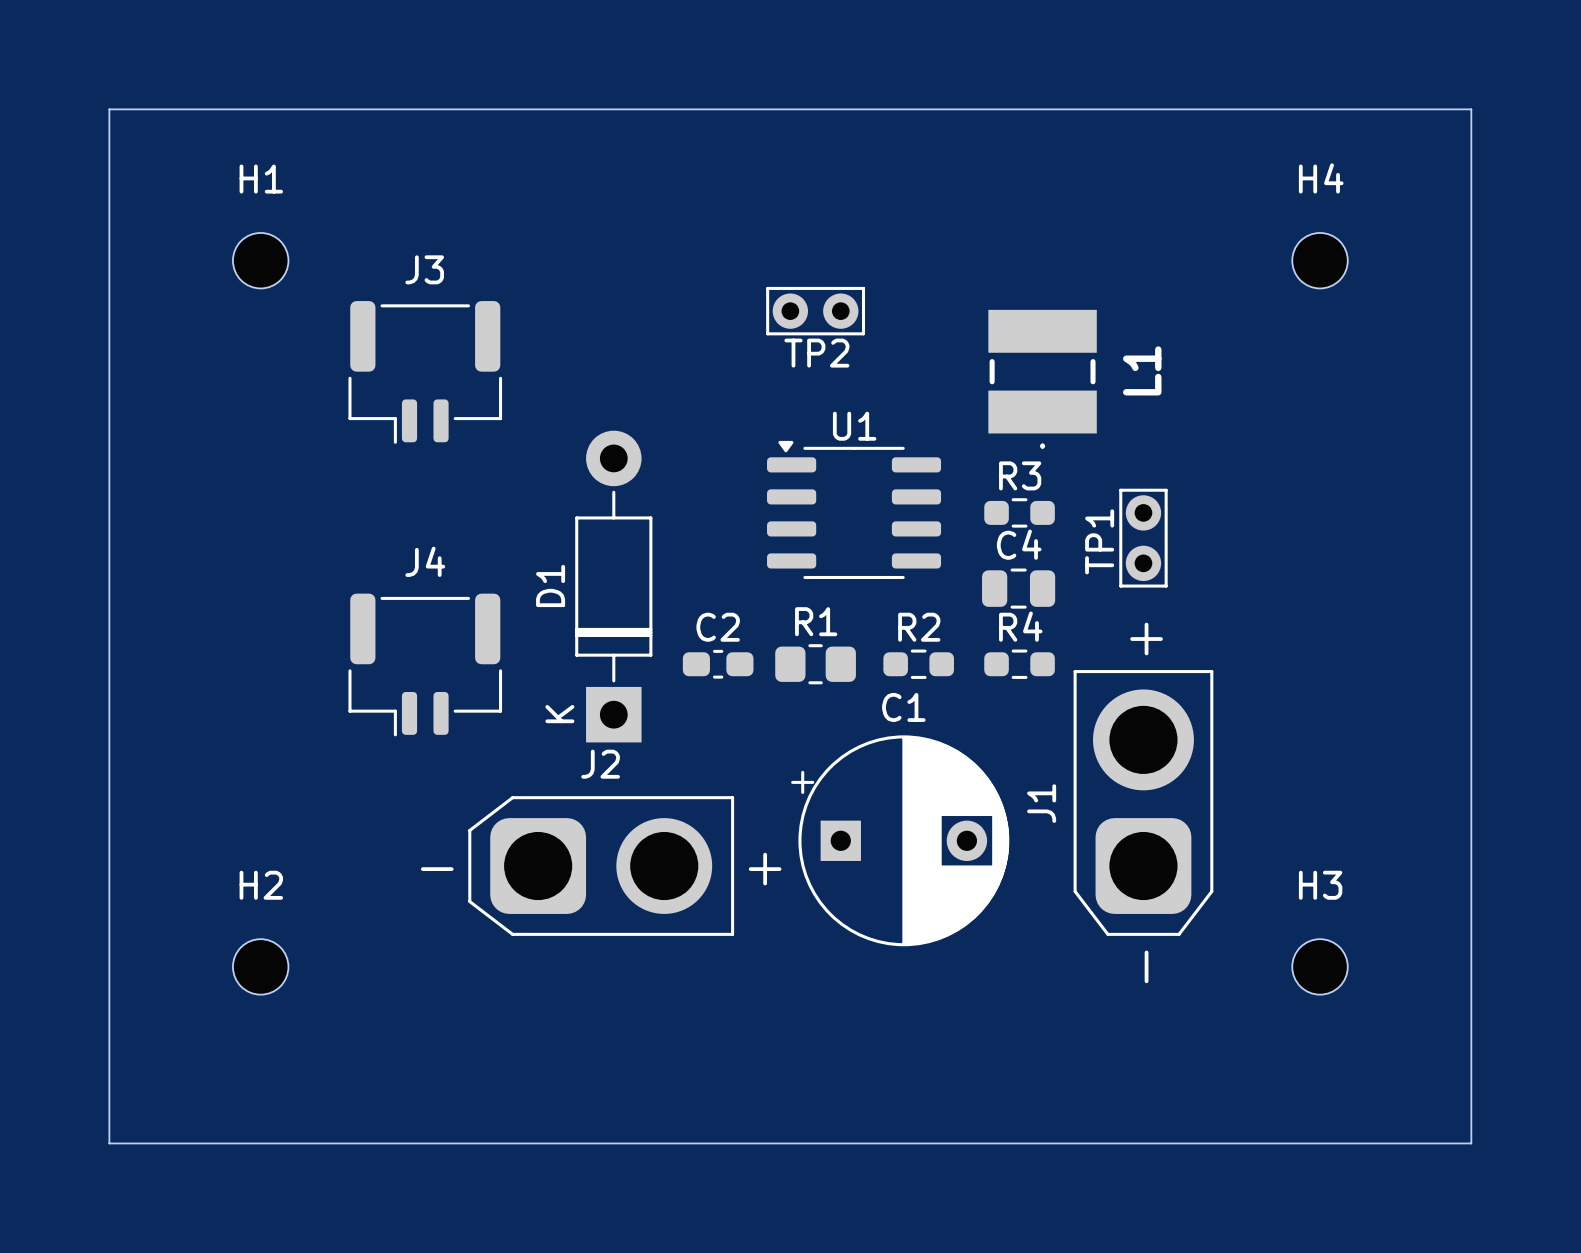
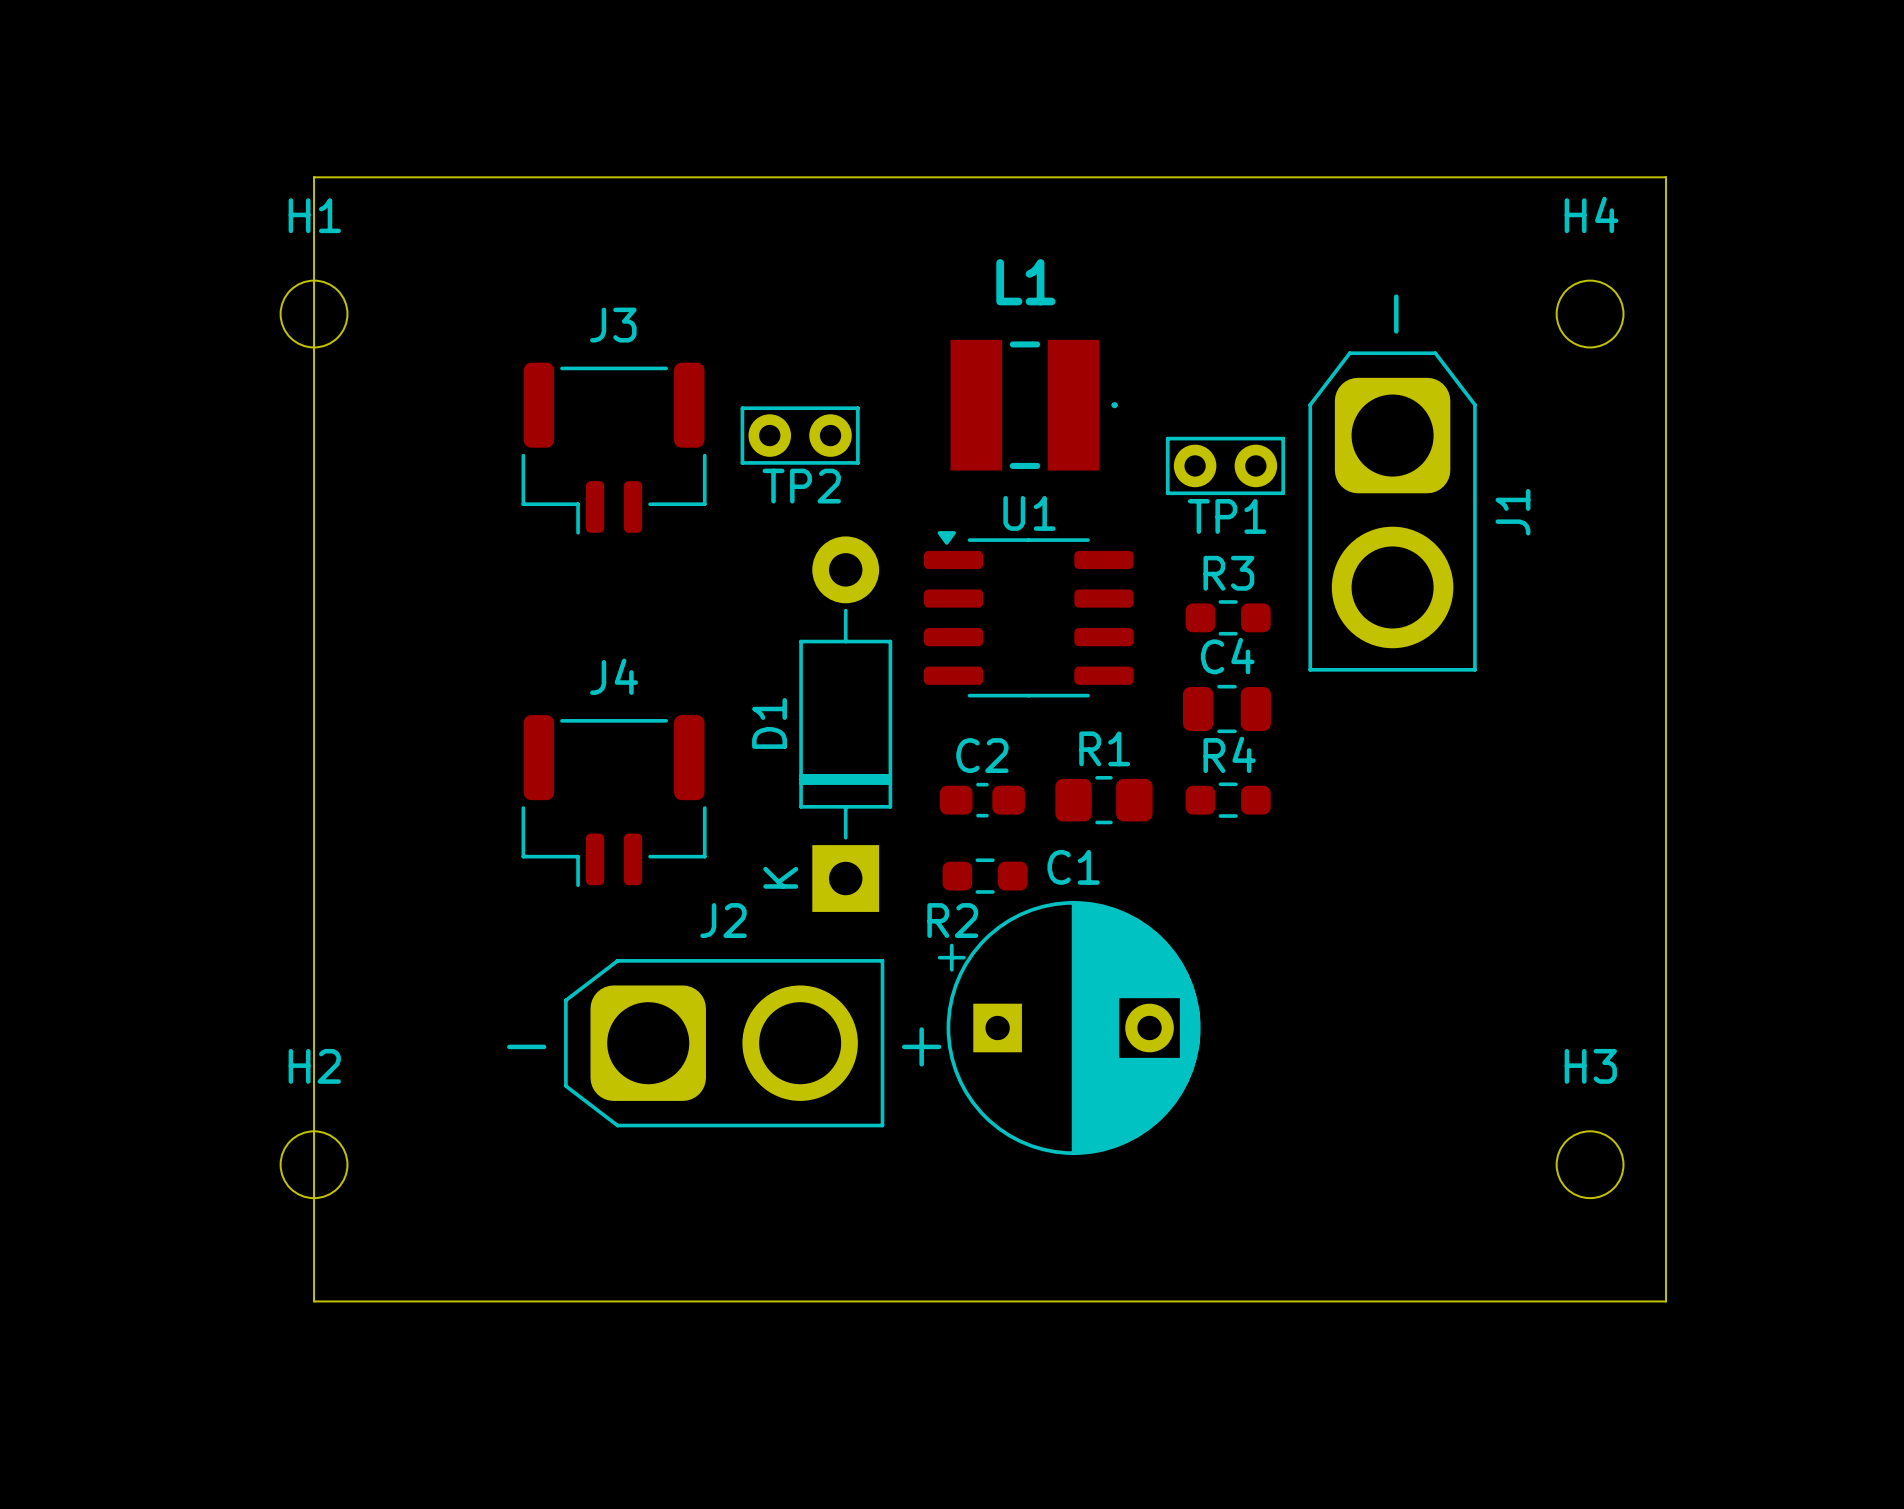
board edge: (109, 109) (1471, 109) (1471, 1143) (109, 1143) (109, 109) -> (314, 177) (314, 1301) (1666, 1301) (1666, 177) (314, 177)
TP2 position: (815, 311) -> (800, 435)
J3 position: (425, 372) -> (614, 448)
L1 rotation: 0° (1042, 379) -> 90° counterclockwise (1034, 405)
L1 position: (1042, 379) -> (1034, 405)
TP1 rotation: 0° (1143, 538) -> 90° clockwise (1225, 465)
TP1 position: (1143, 538) -> (1225, 465)
TP1 name position: TP1 (1099, 541) -> TP1 (1227, 516)
D1 position: (613, 586) -> (845, 724)
R2 name position: R2 (919, 627) -> R2 (952, 920)
C2 position: (718, 664) -> (982, 800)
R1 position: (815, 664) -> (1103, 800)
R2 position: (918, 664) -> (985, 876)
J4 position: (425, 665) -> (614, 801)
J1 footprint: [1073, 670, 1214, 936] -> [1308, 351, 1477, 672]
J1 name position: J1 (1041, 803) -> J1 (1512, 512)
C1 position: (900, 840) -> (1069, 1028)

